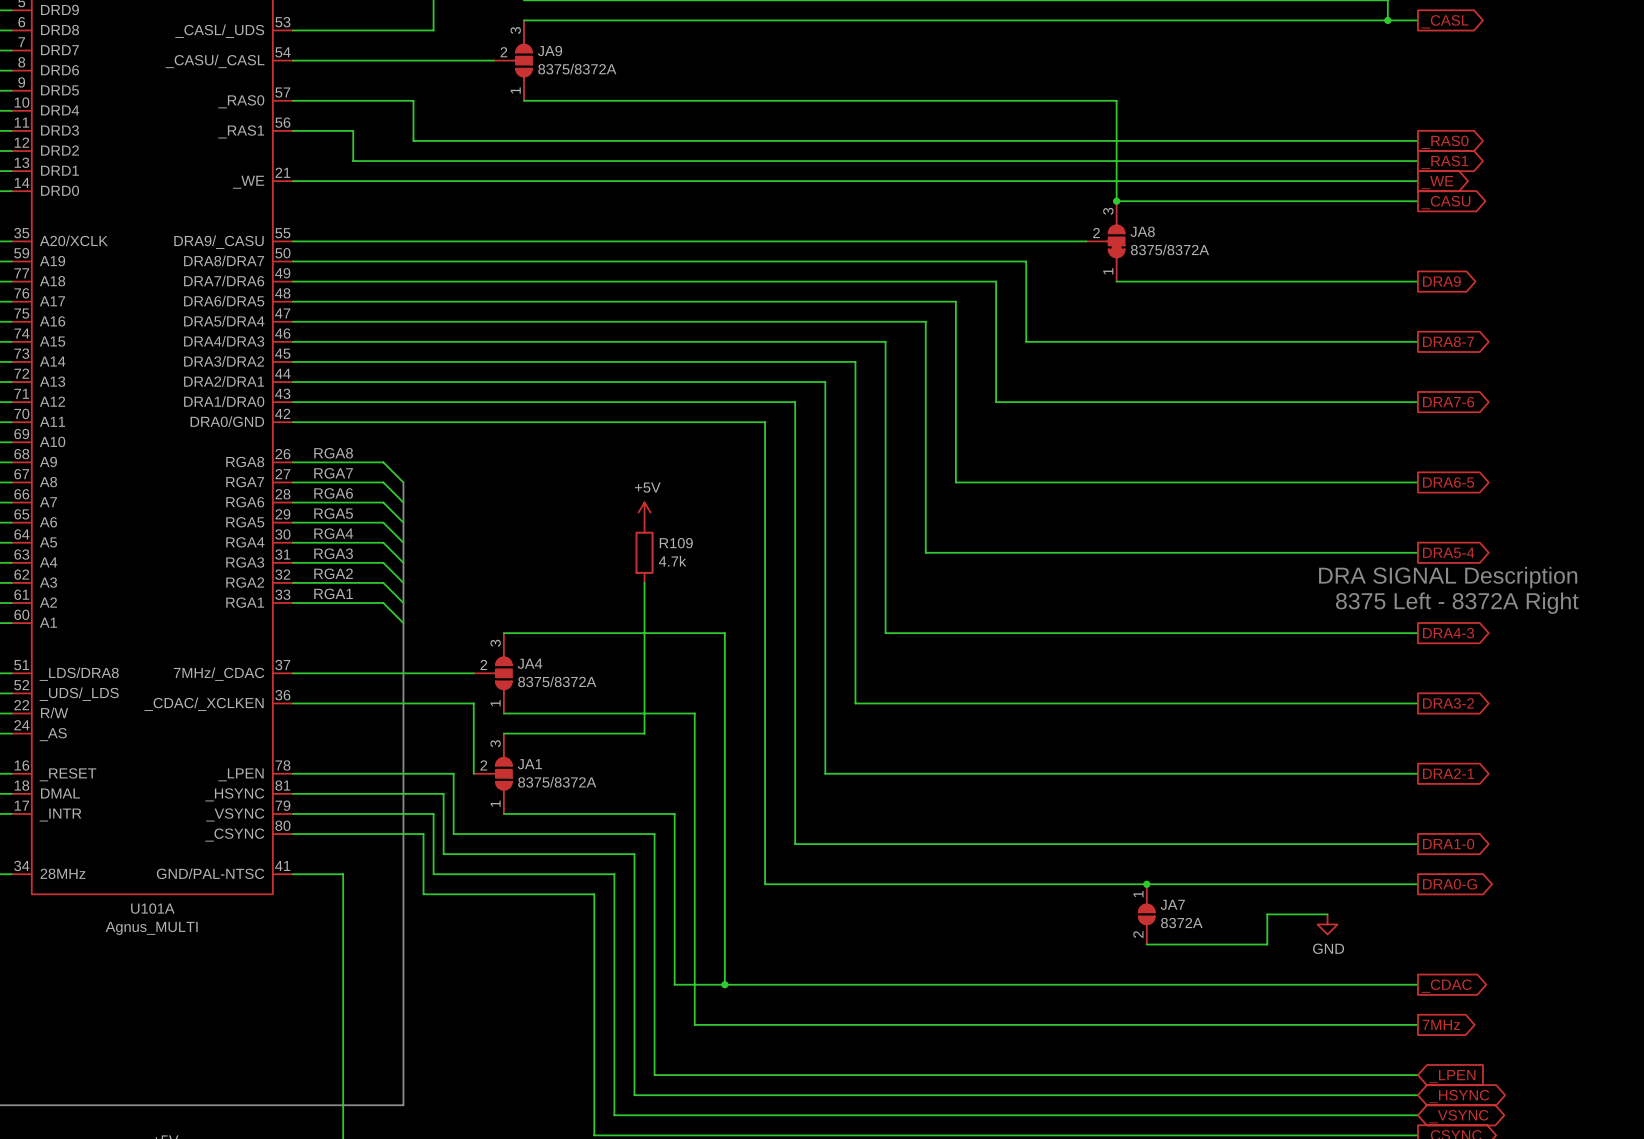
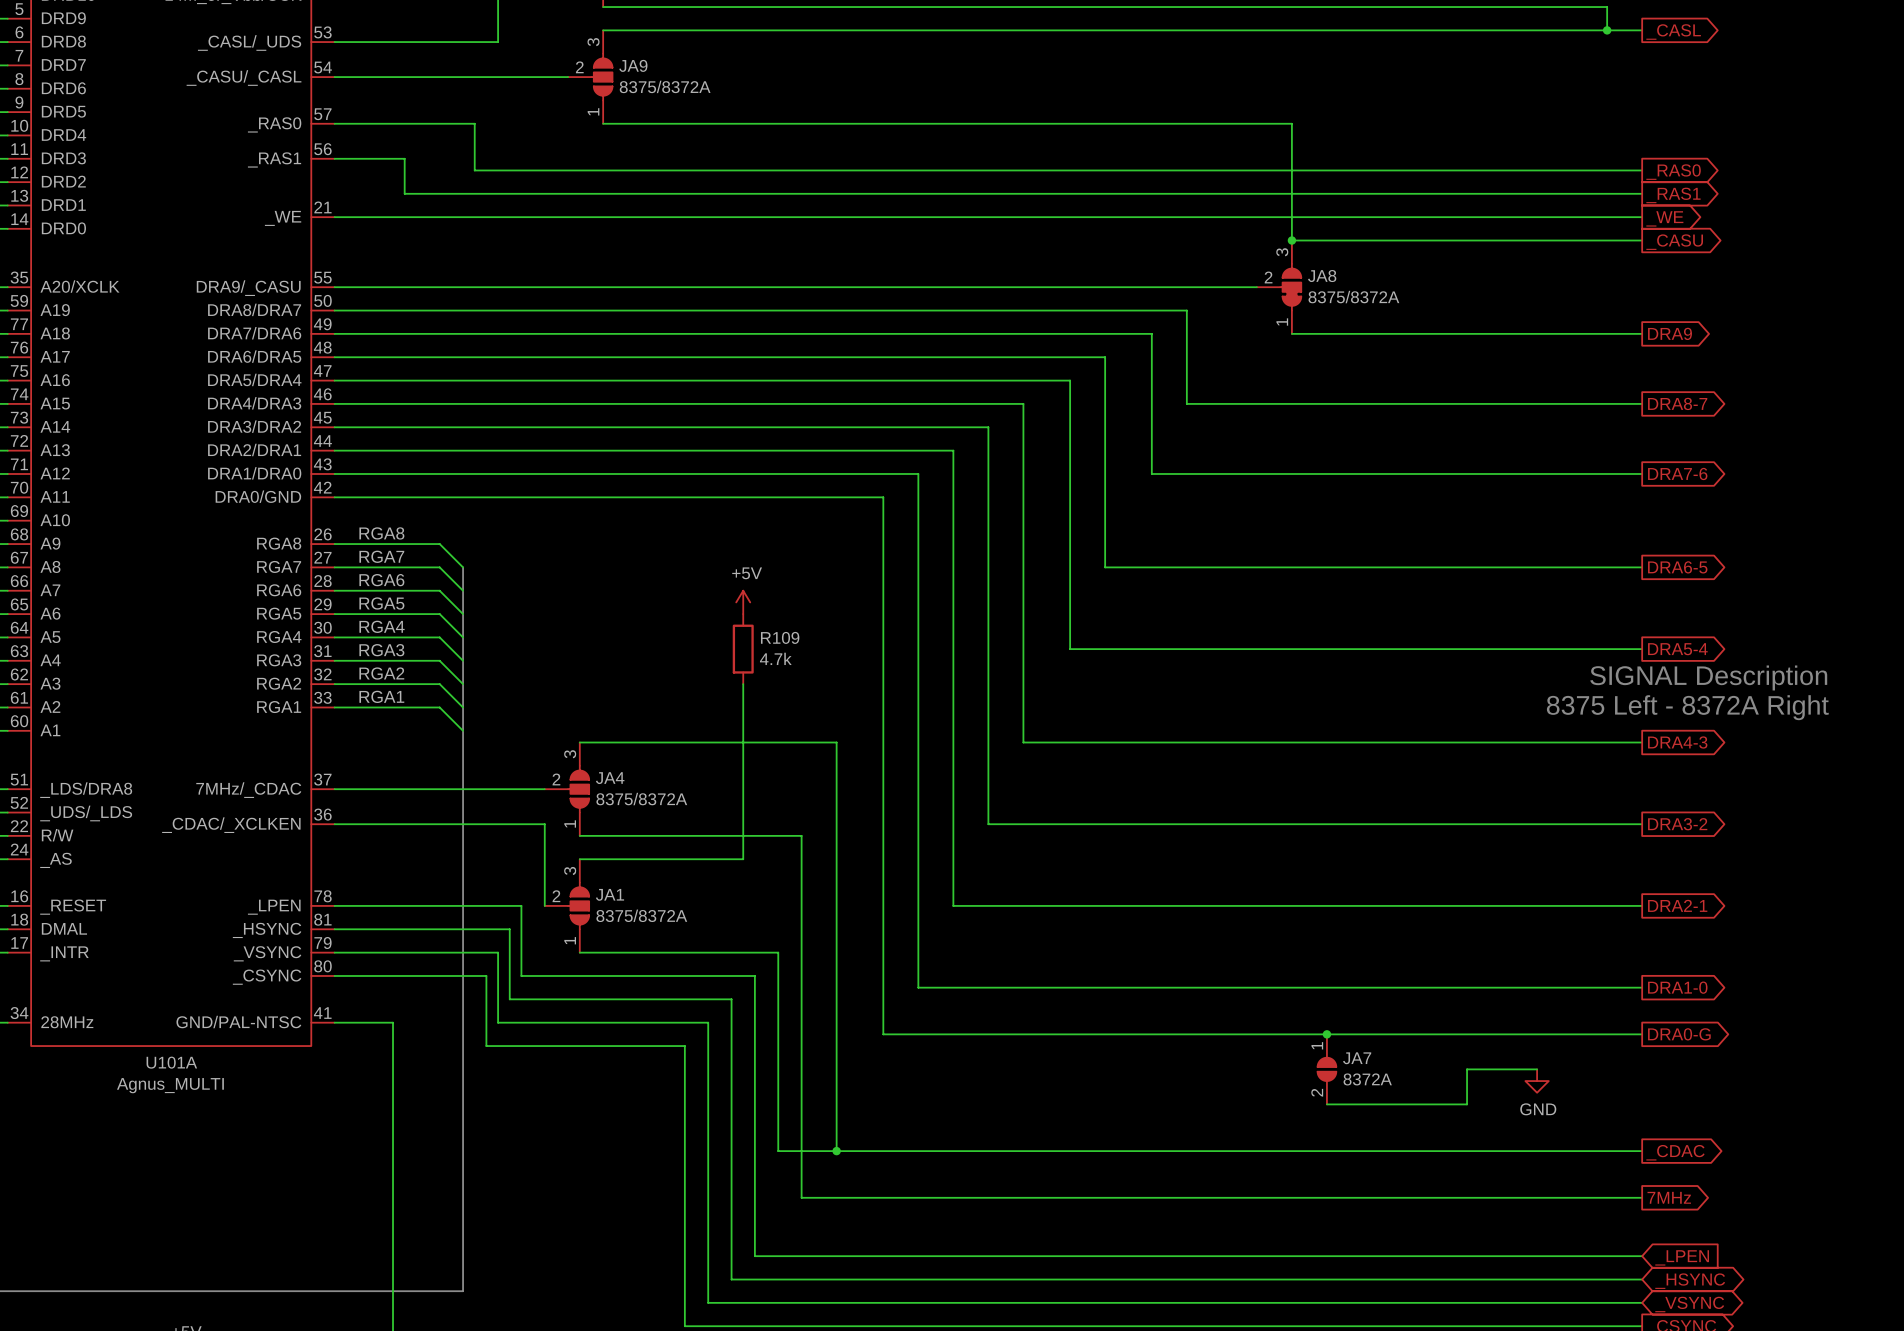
text: DRA SIGNAL Description (1448, 577) -> SIGNAL Description (1708, 677)

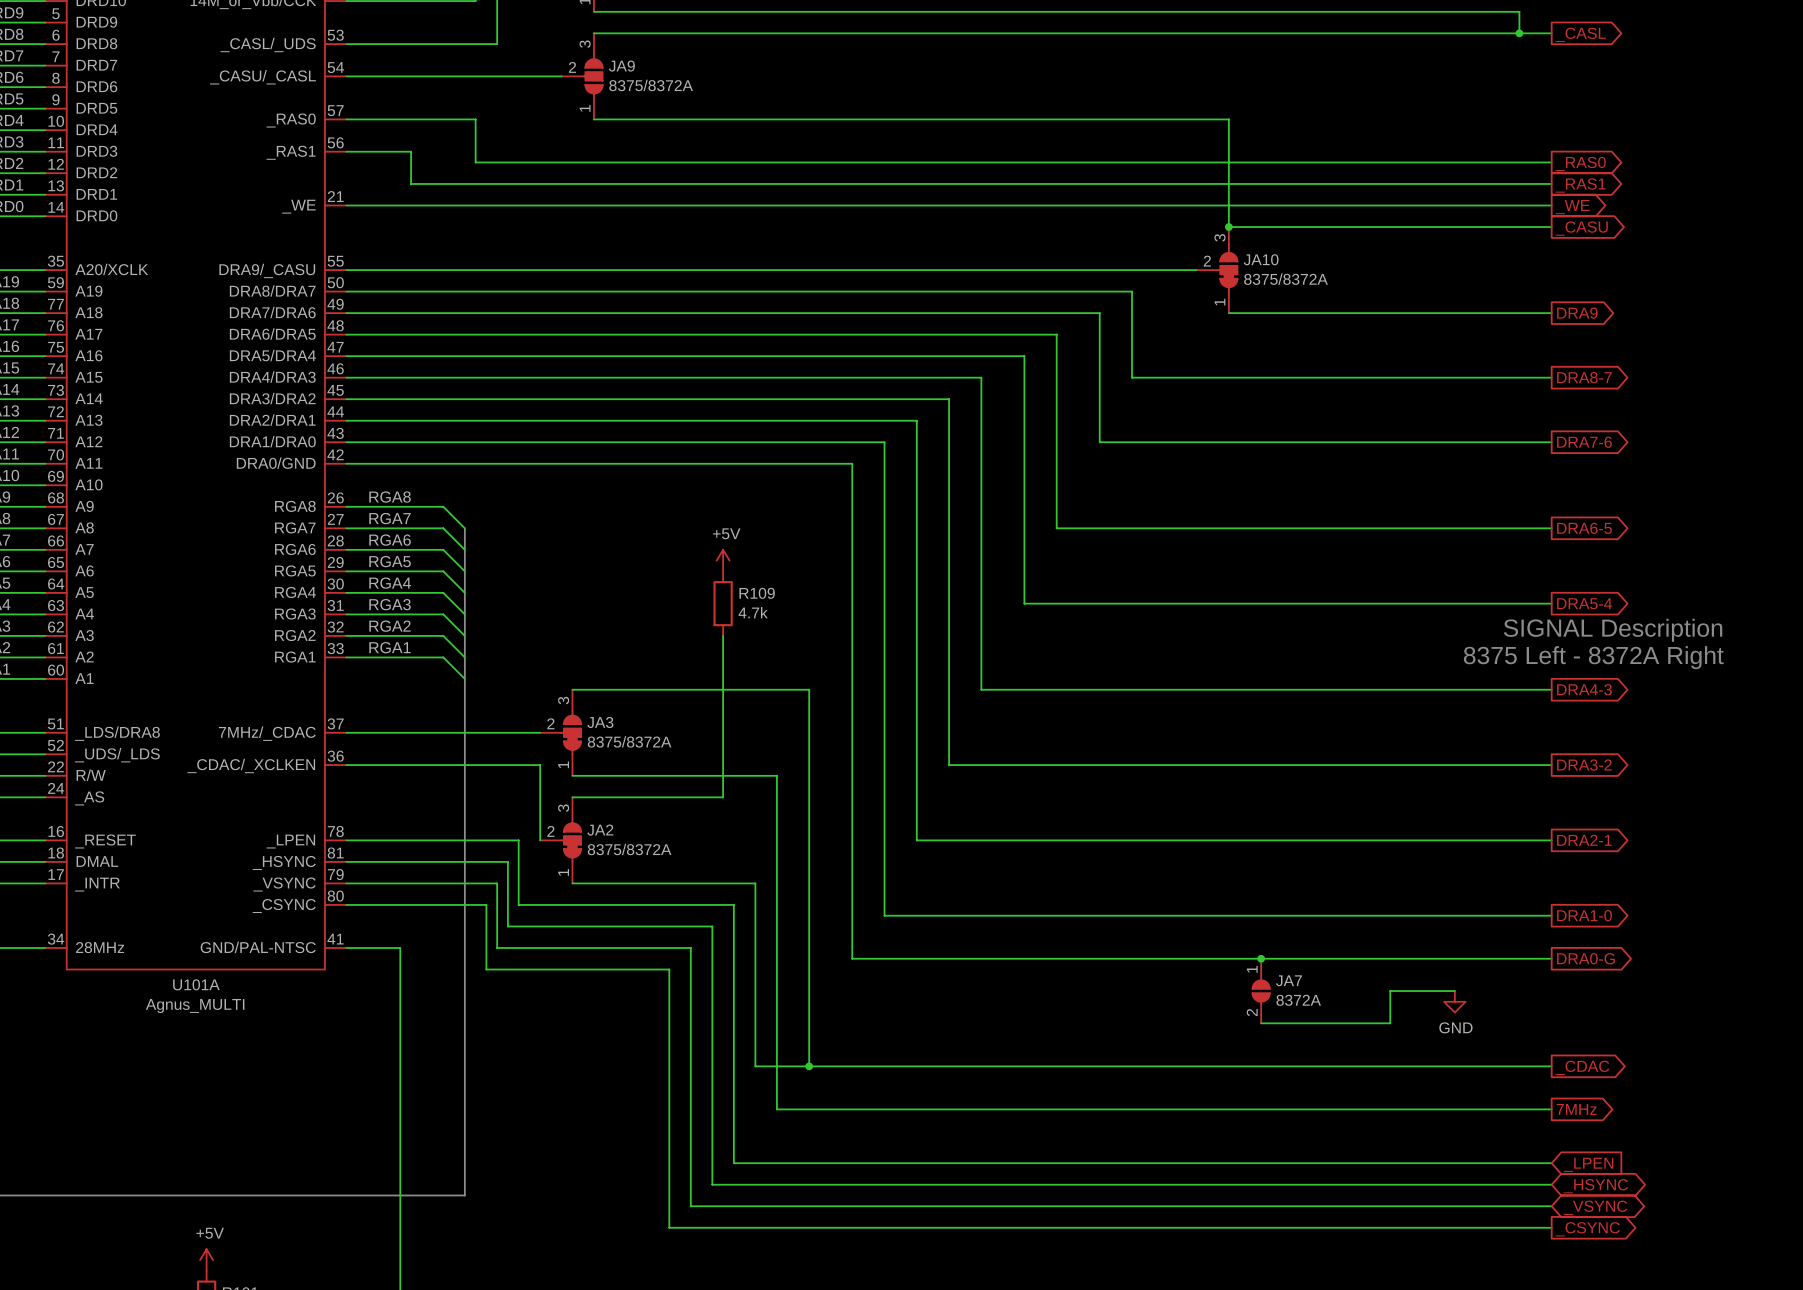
JA8 name: JA8 (1322, 276) -> JA10 (1261, 259)
JA4: 8375/8372A (566, 789) -> none
JA3: none -> 8375/8372A (560, 732)
JA1: 8375/8372A (566, 905) -> none
JA2: none -> 8375/8372A (560, 840)

